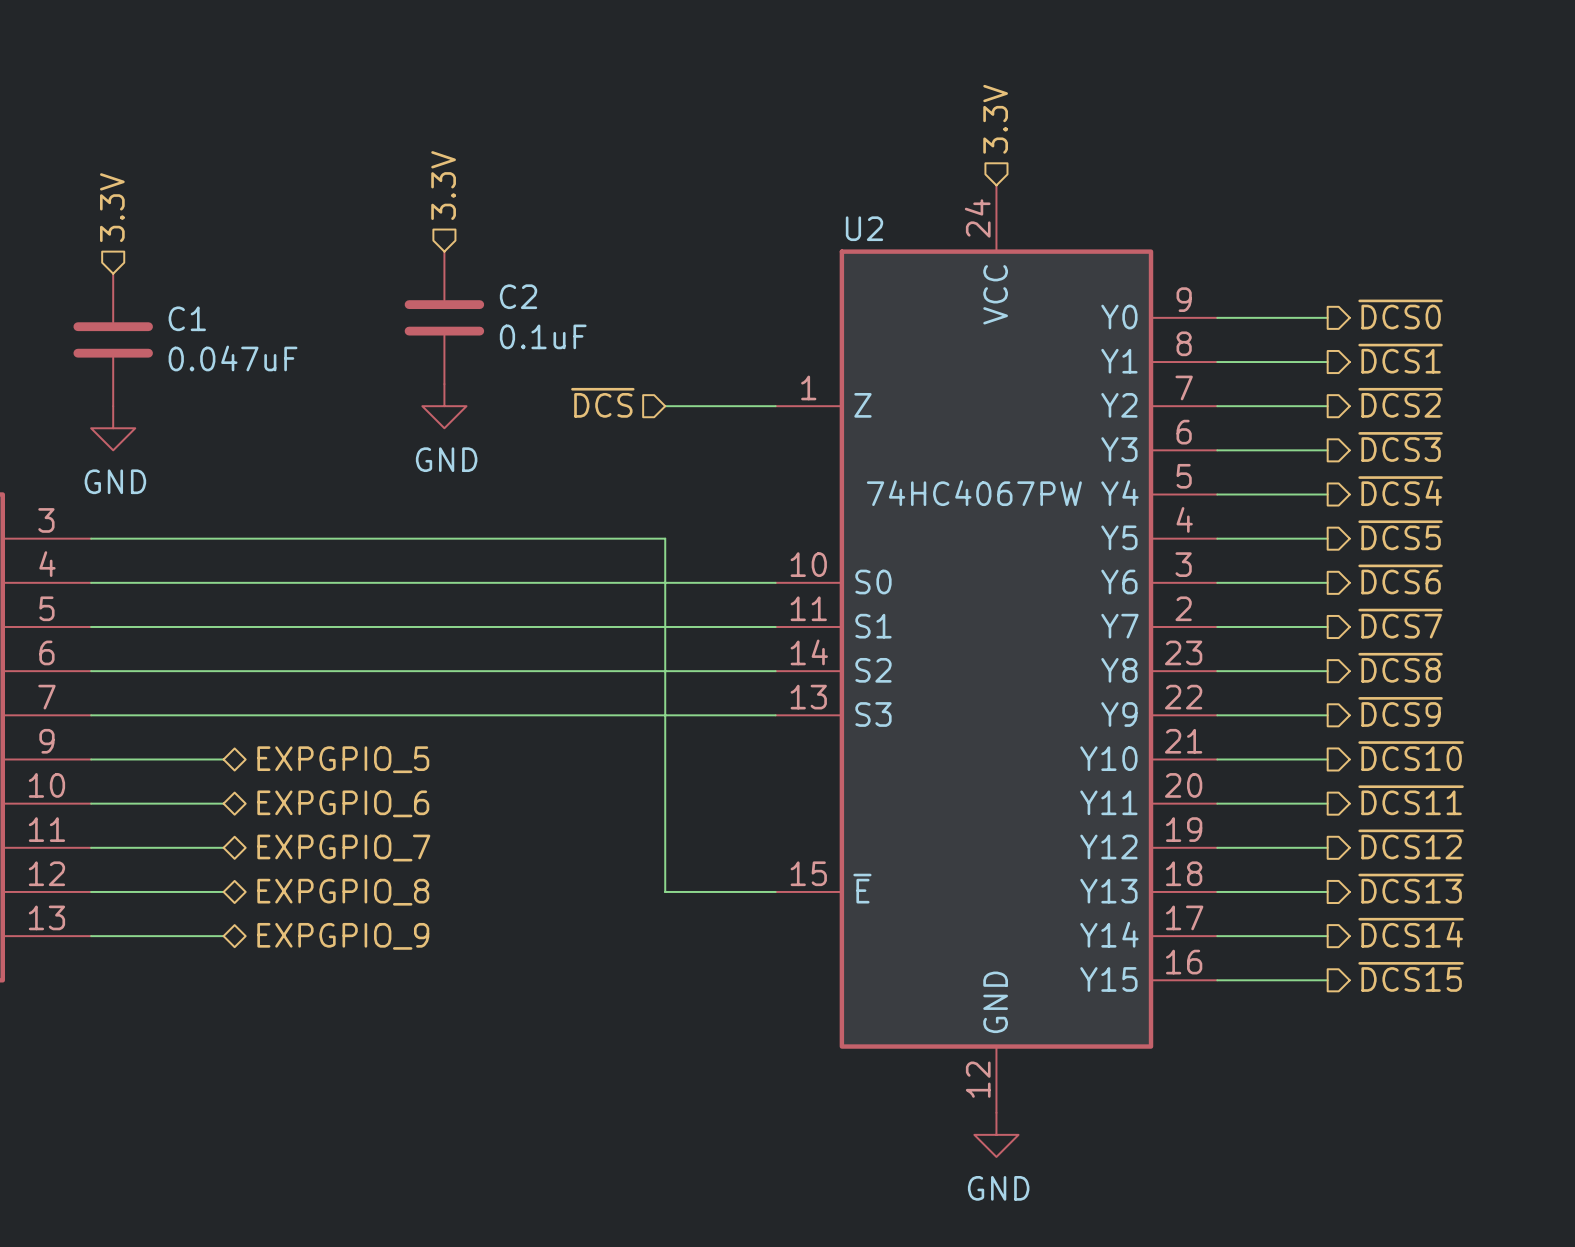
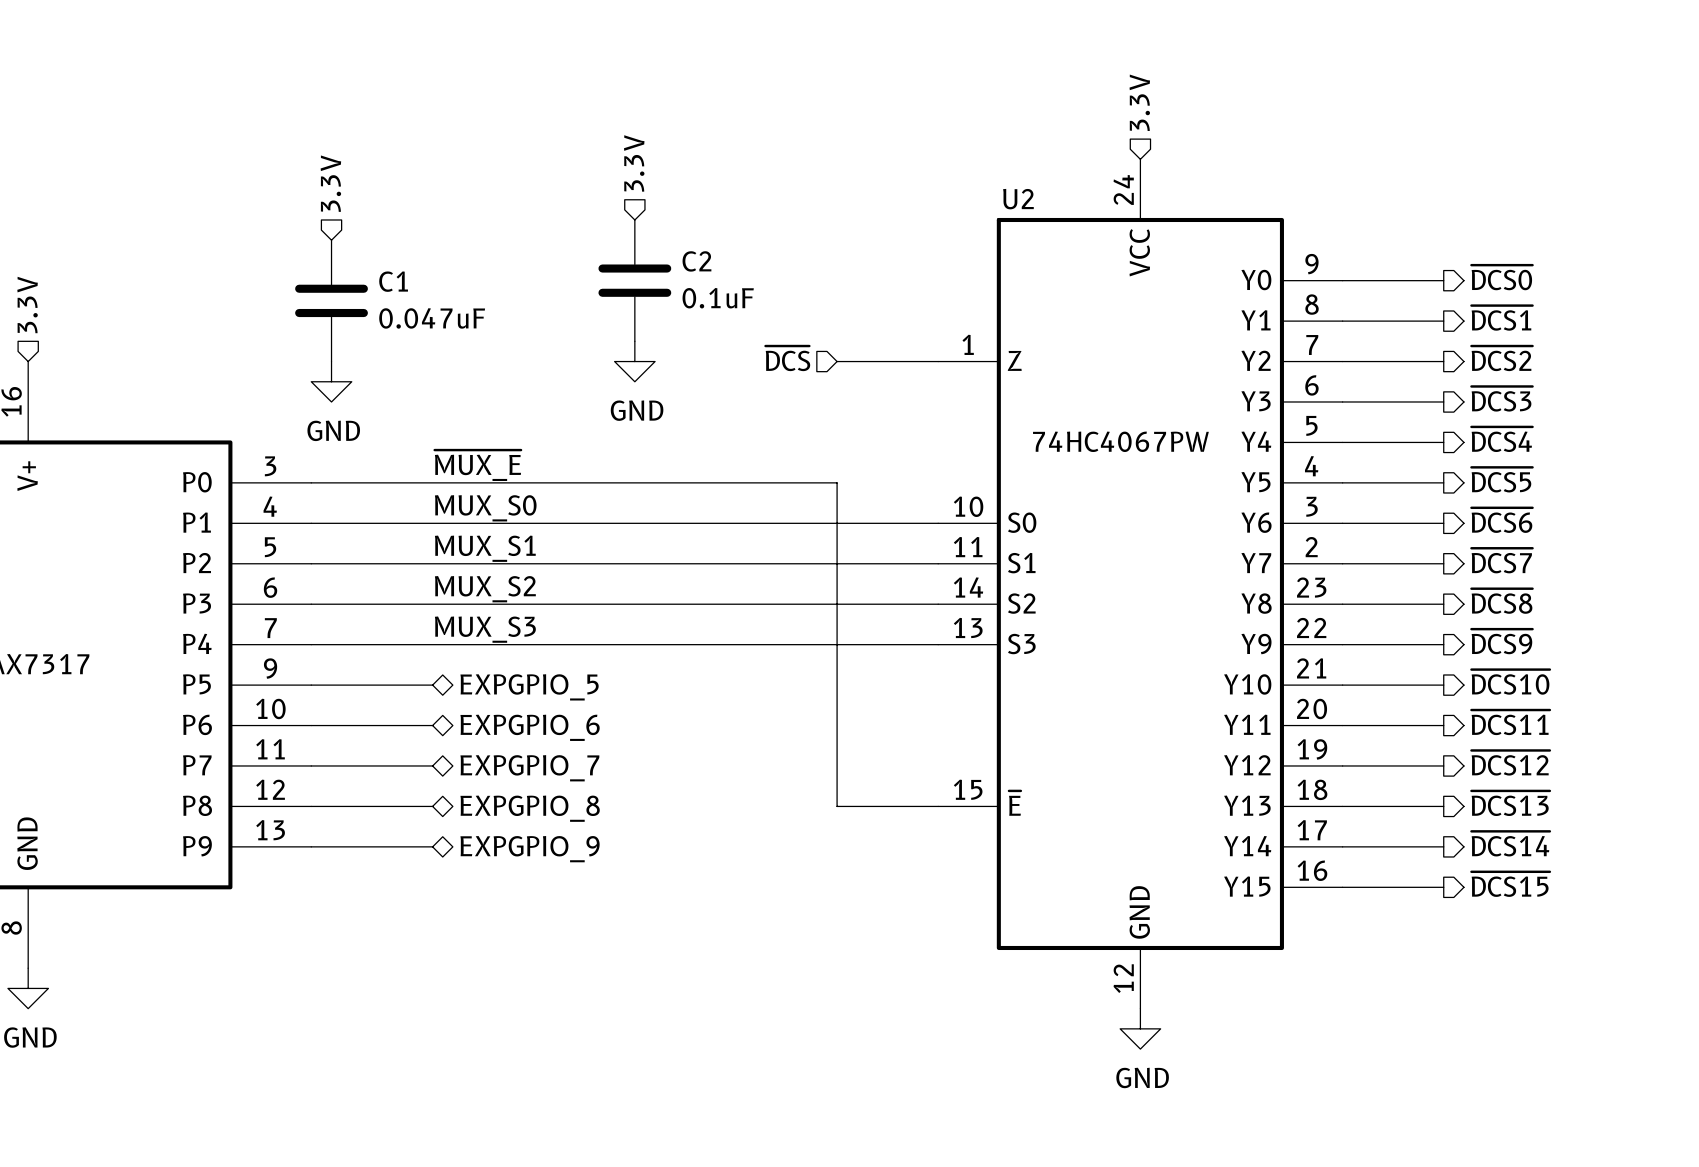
label: none -> ~{MUX_E} (477, 465)
label: none -> MUX_S0 (485, 508)
label: none -> MUX_S1 (485, 548)
label: none -> MUX_S2 (485, 589)
label: none -> MUX_S3 (485, 629)

